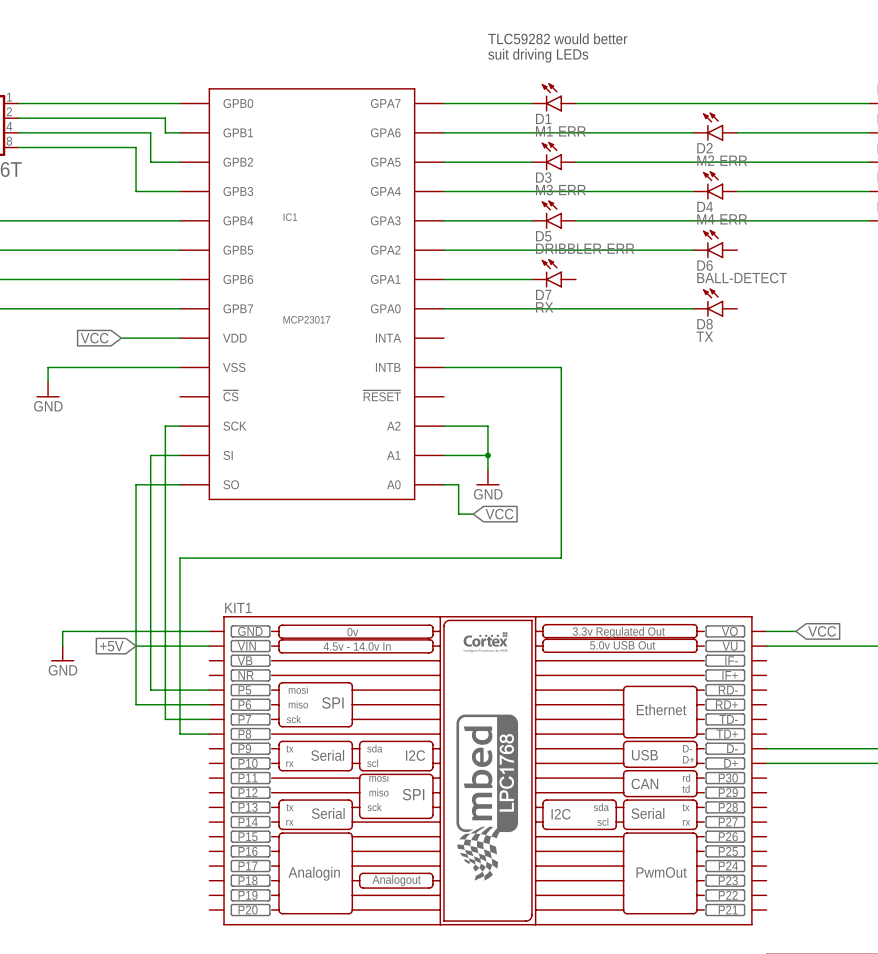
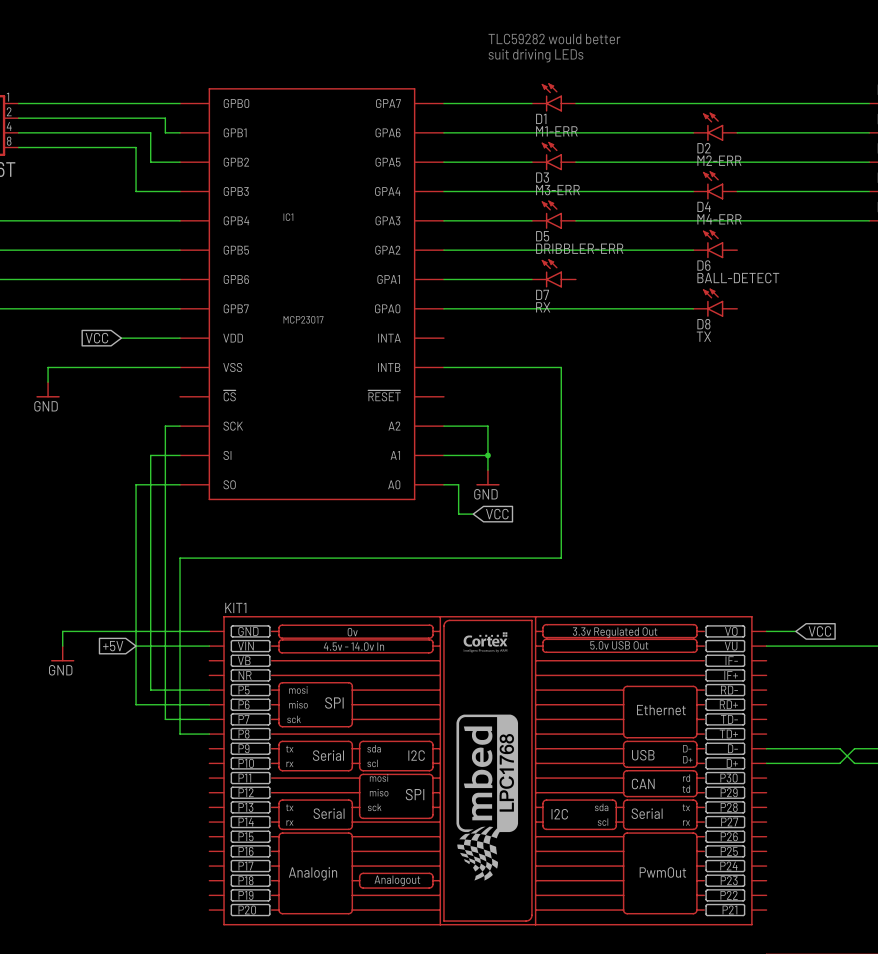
wire: (839, 748) (854, 748) -> (839, 748) (854, 763)
wire: (839, 763) (854, 763) -> (839, 763) (854, 748)

